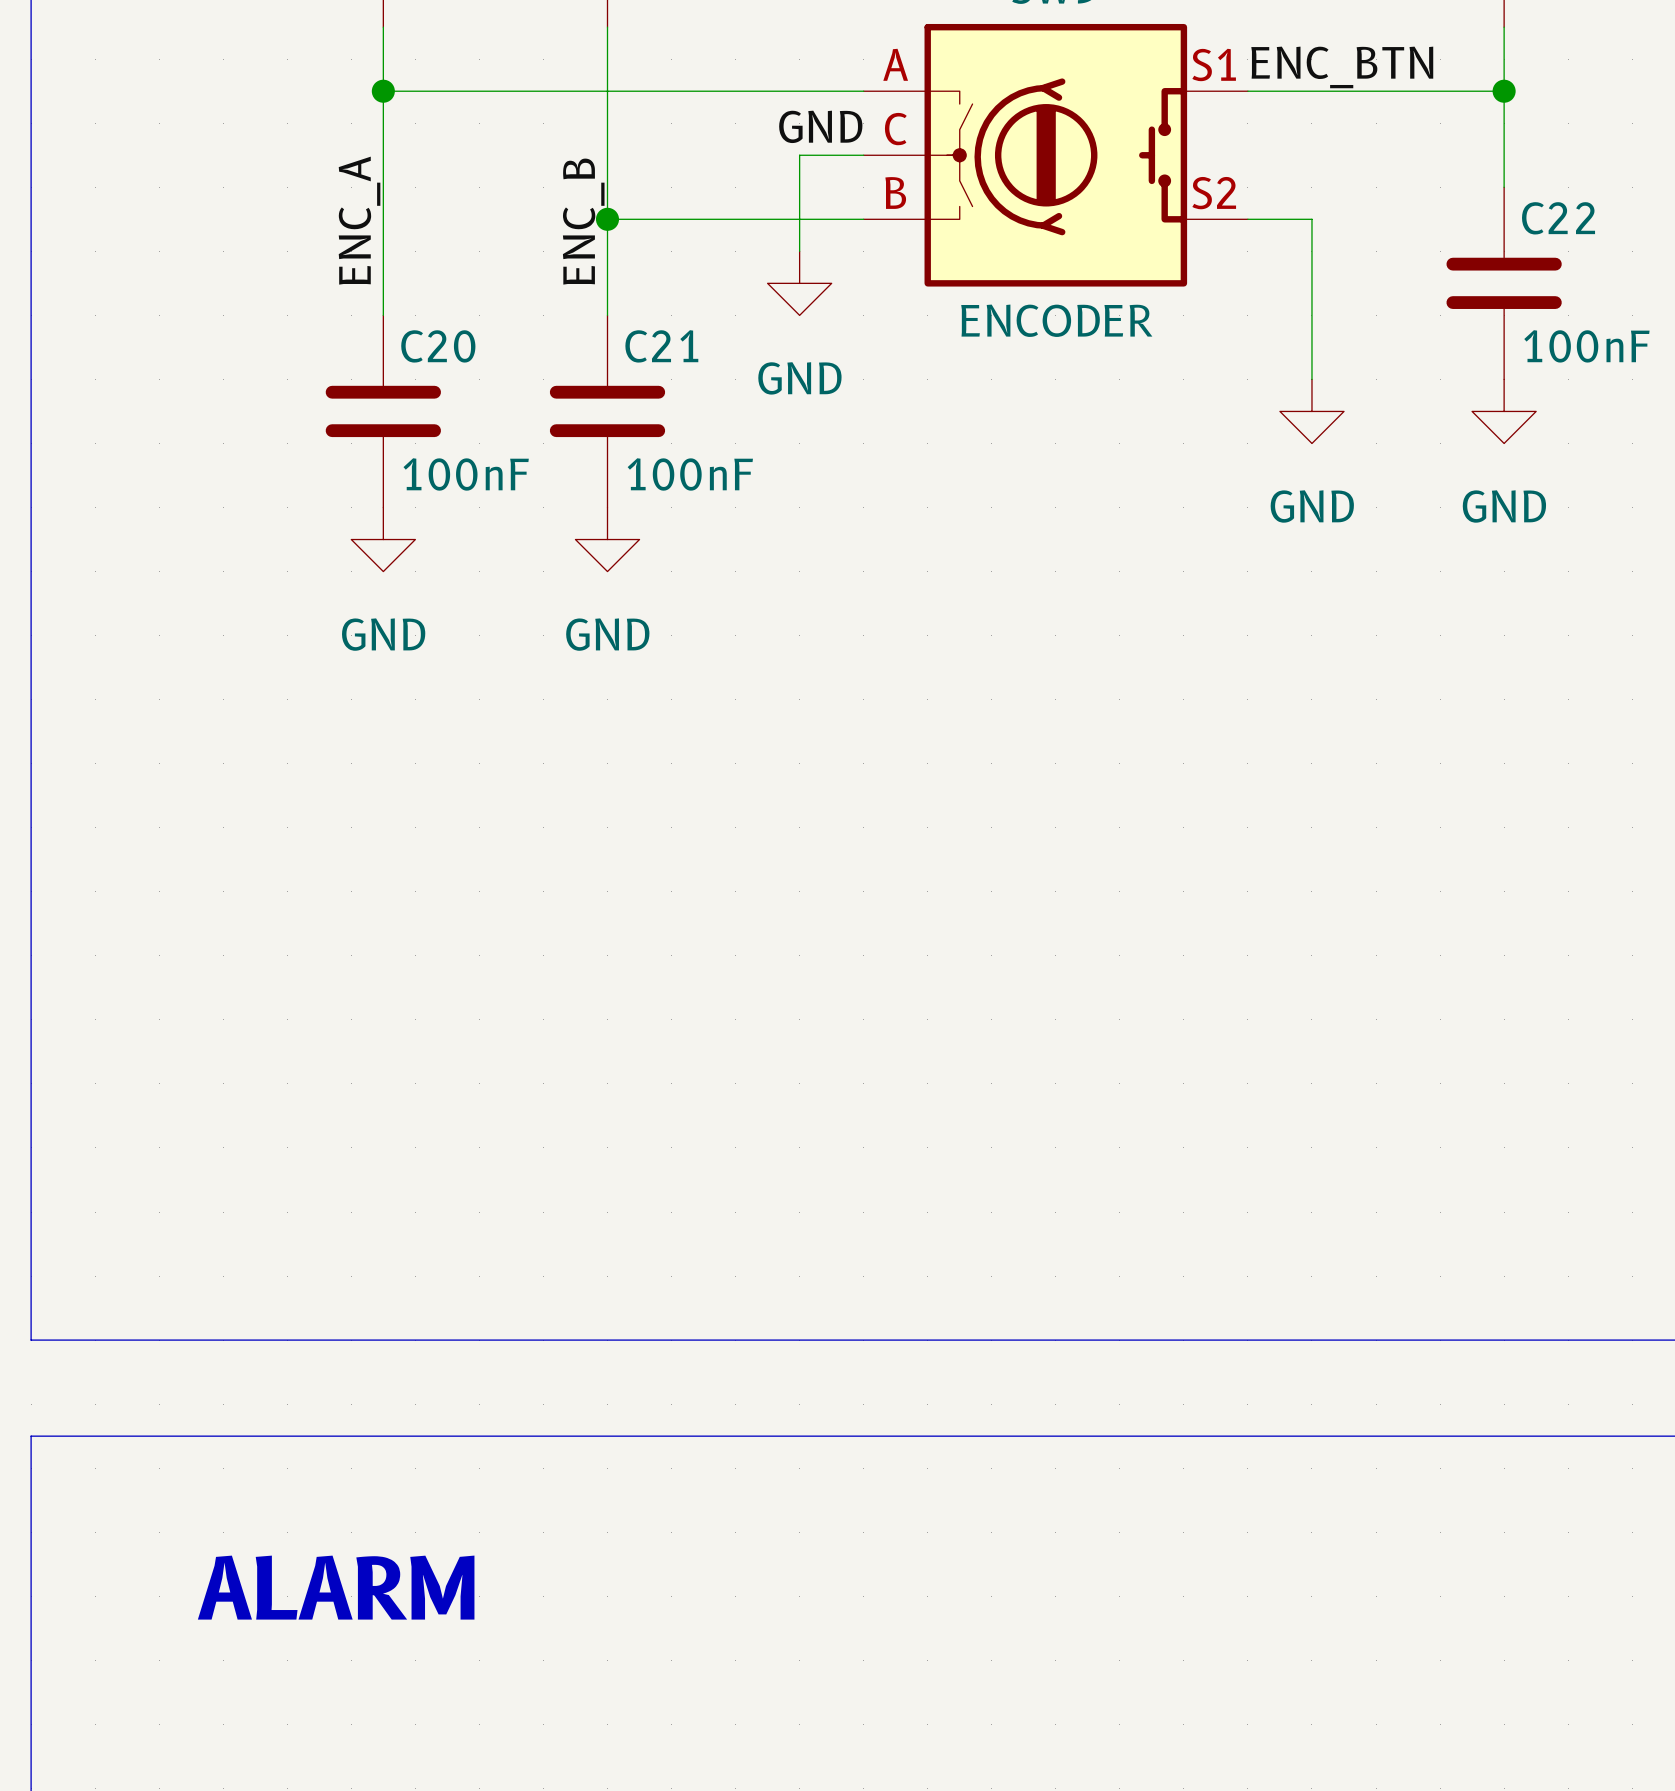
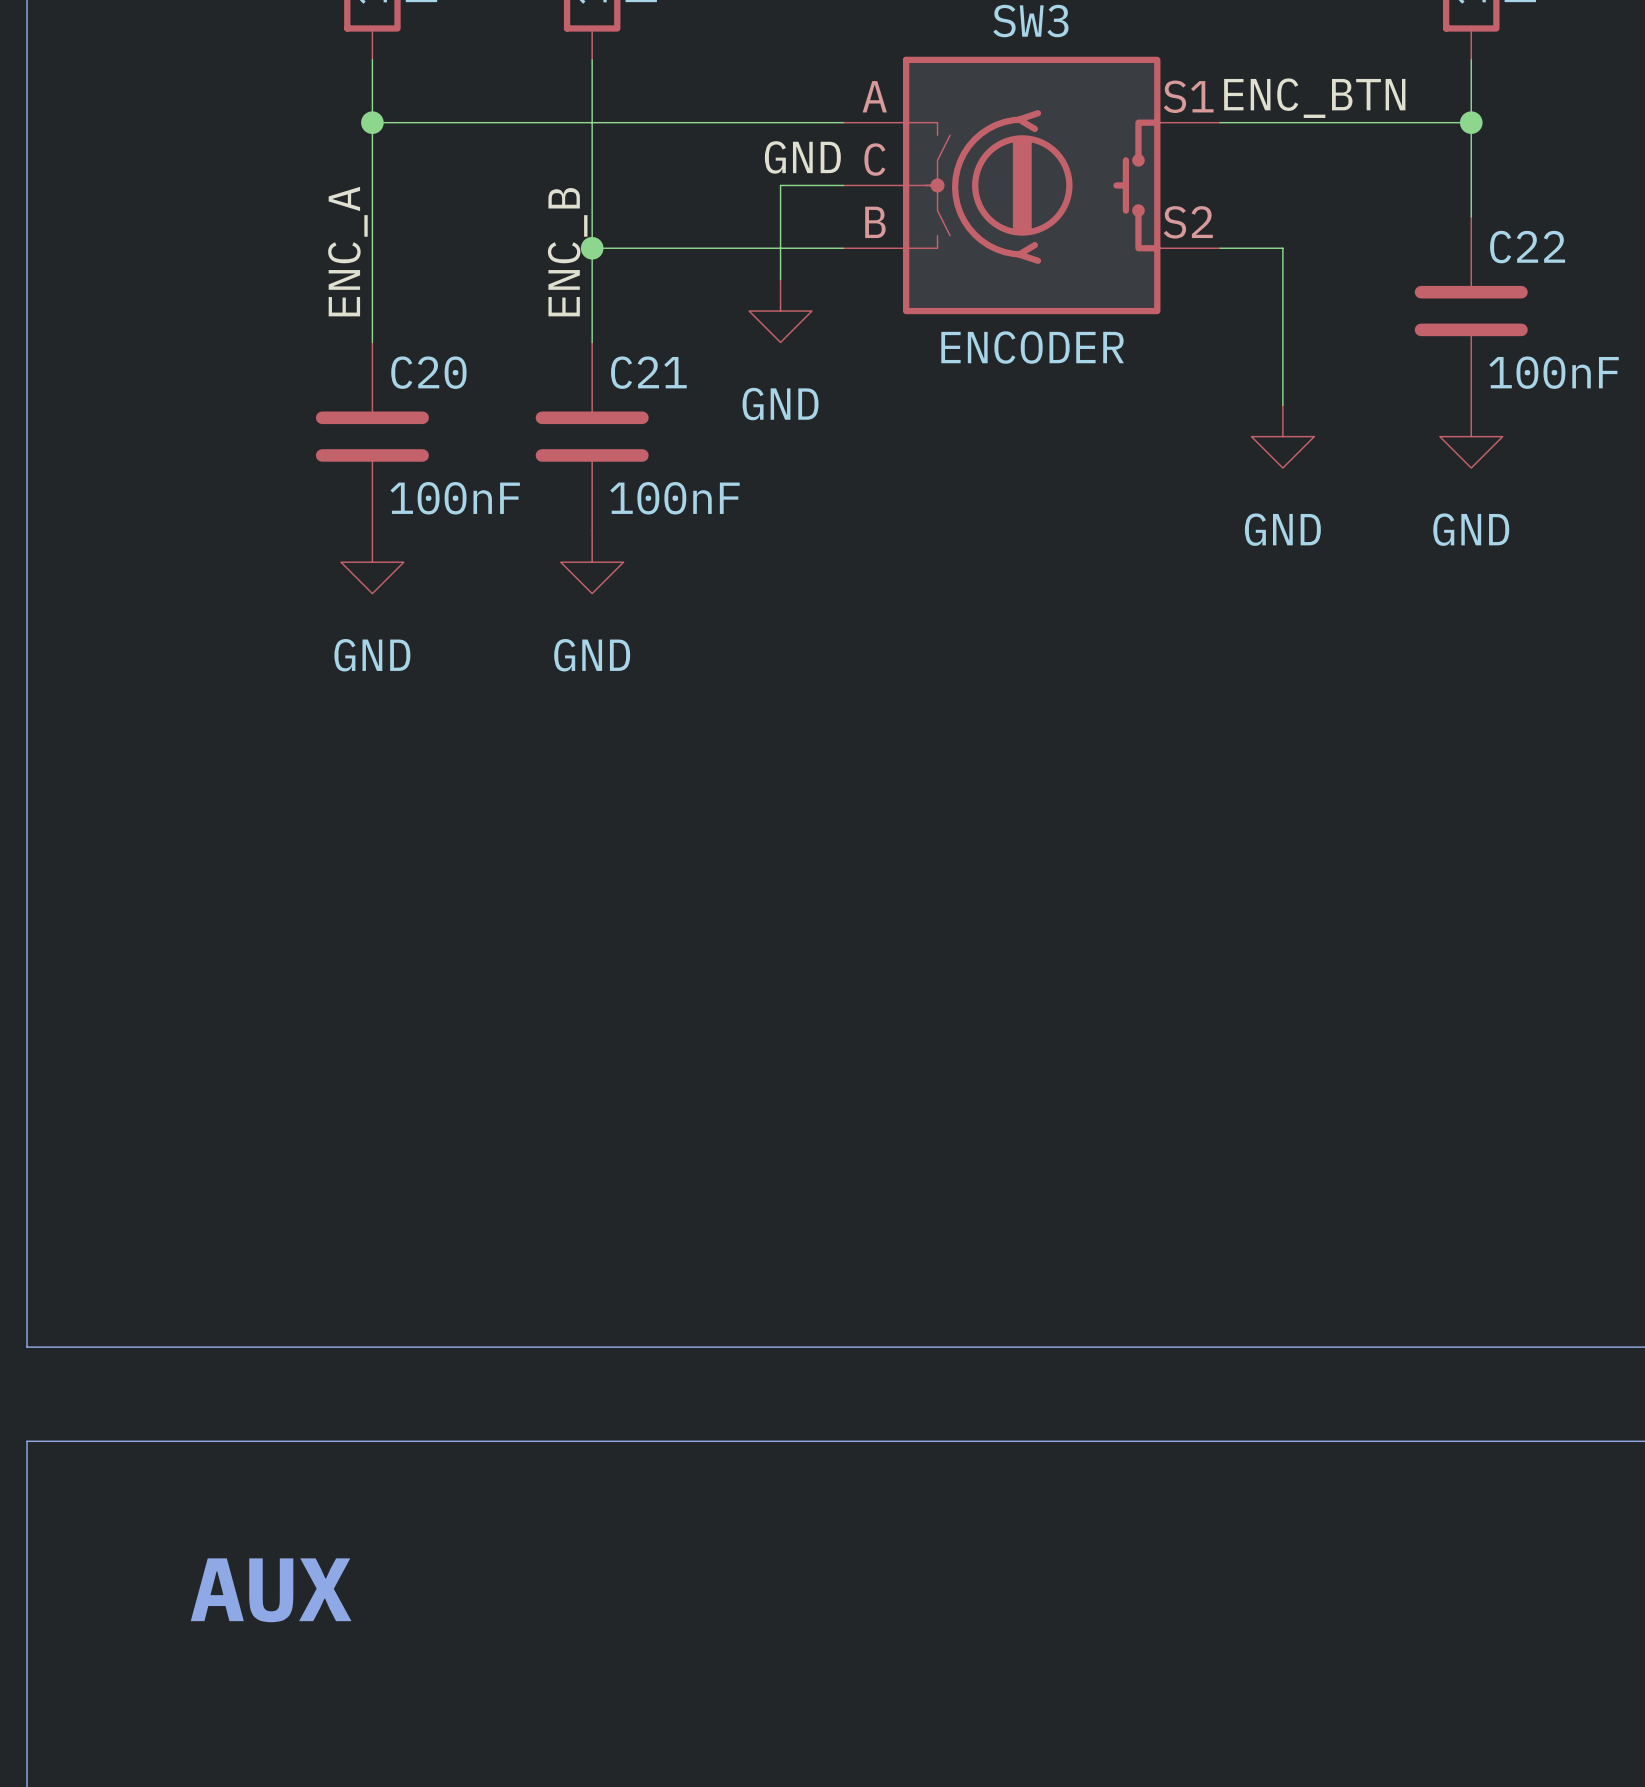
text: ALARM (336, 1587) -> AUX (271, 1590)

